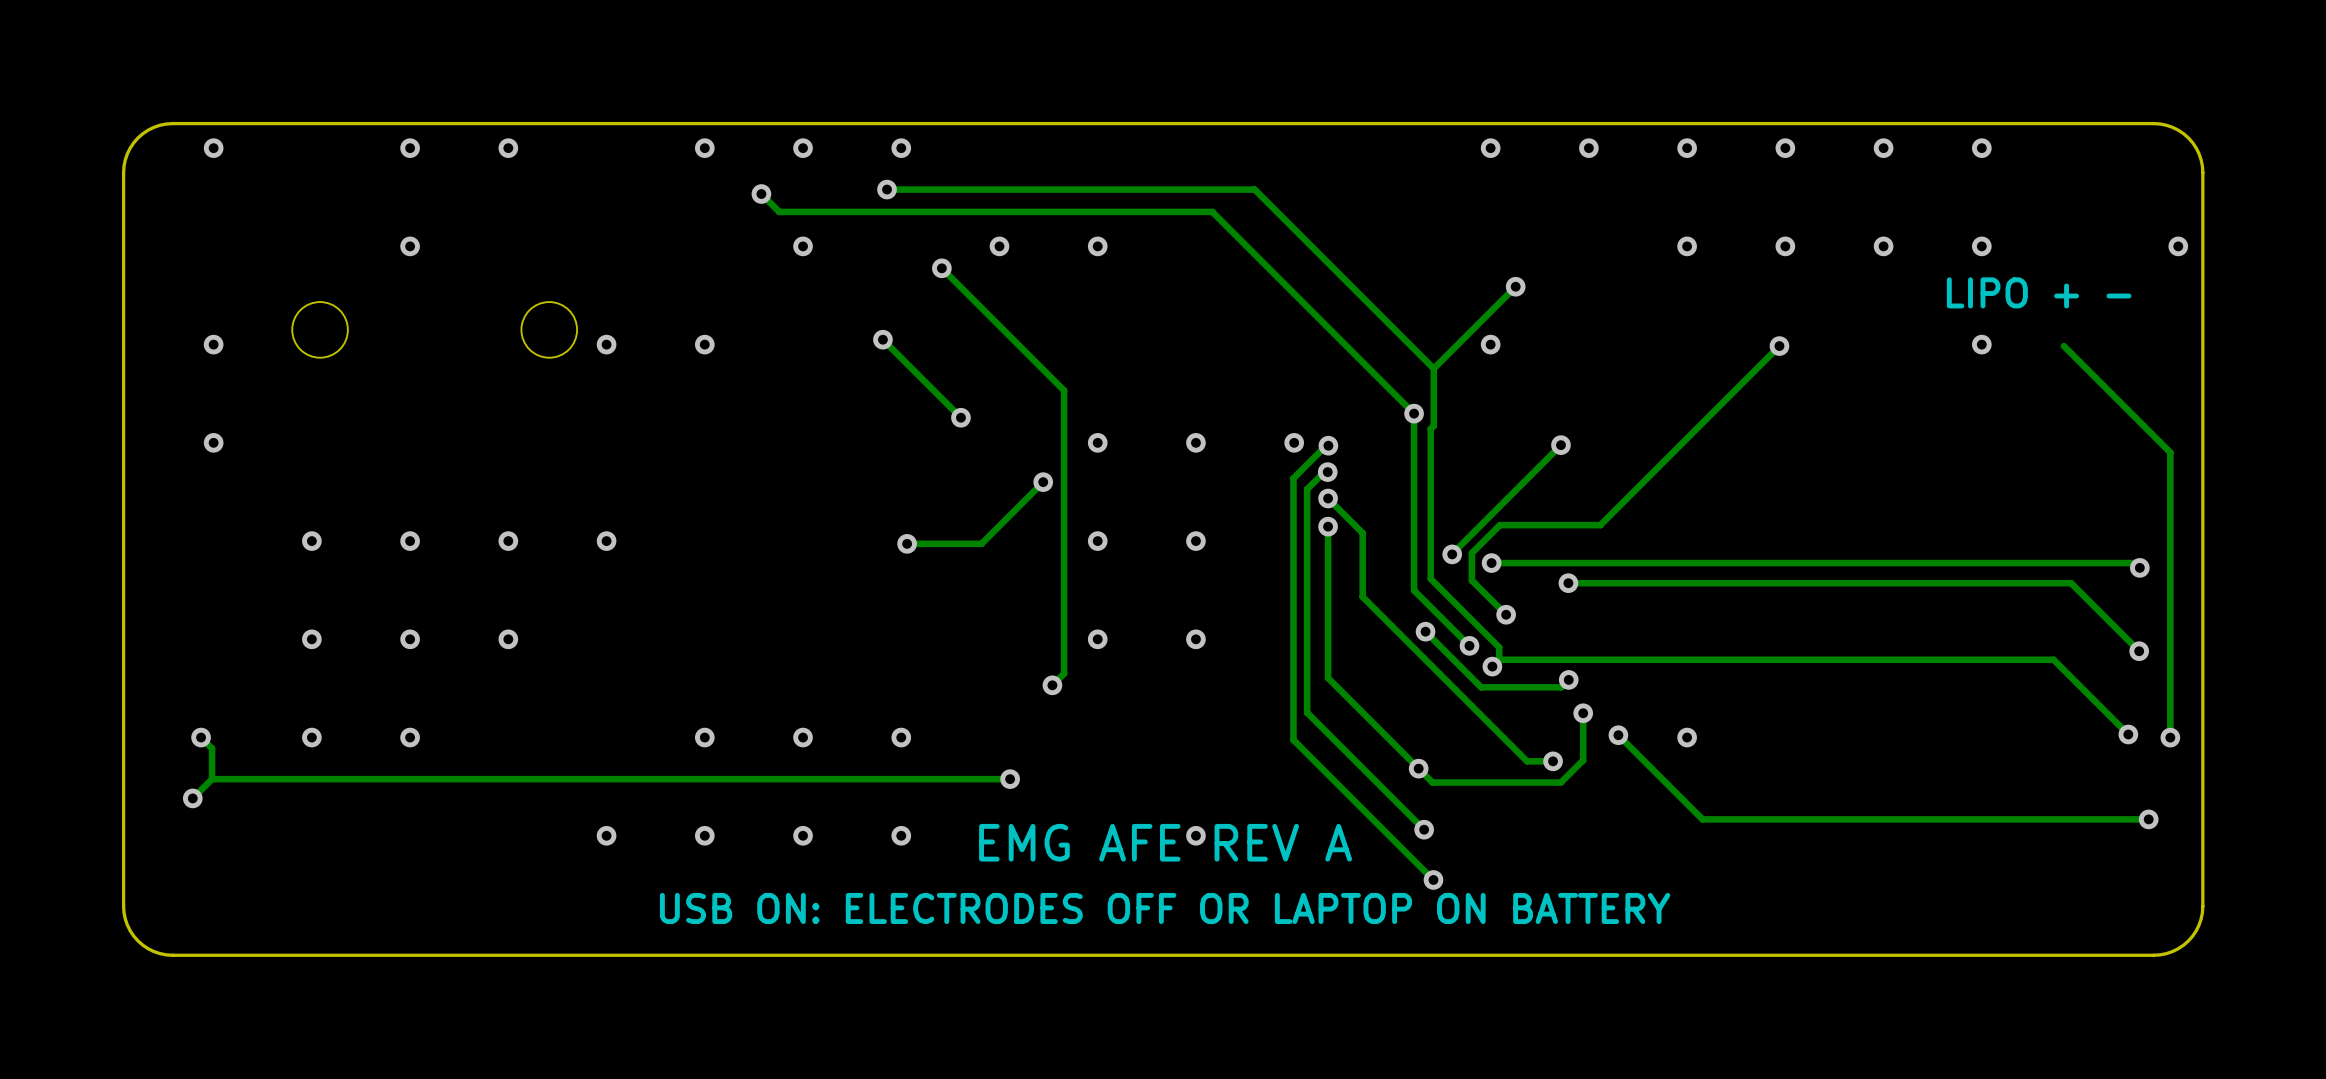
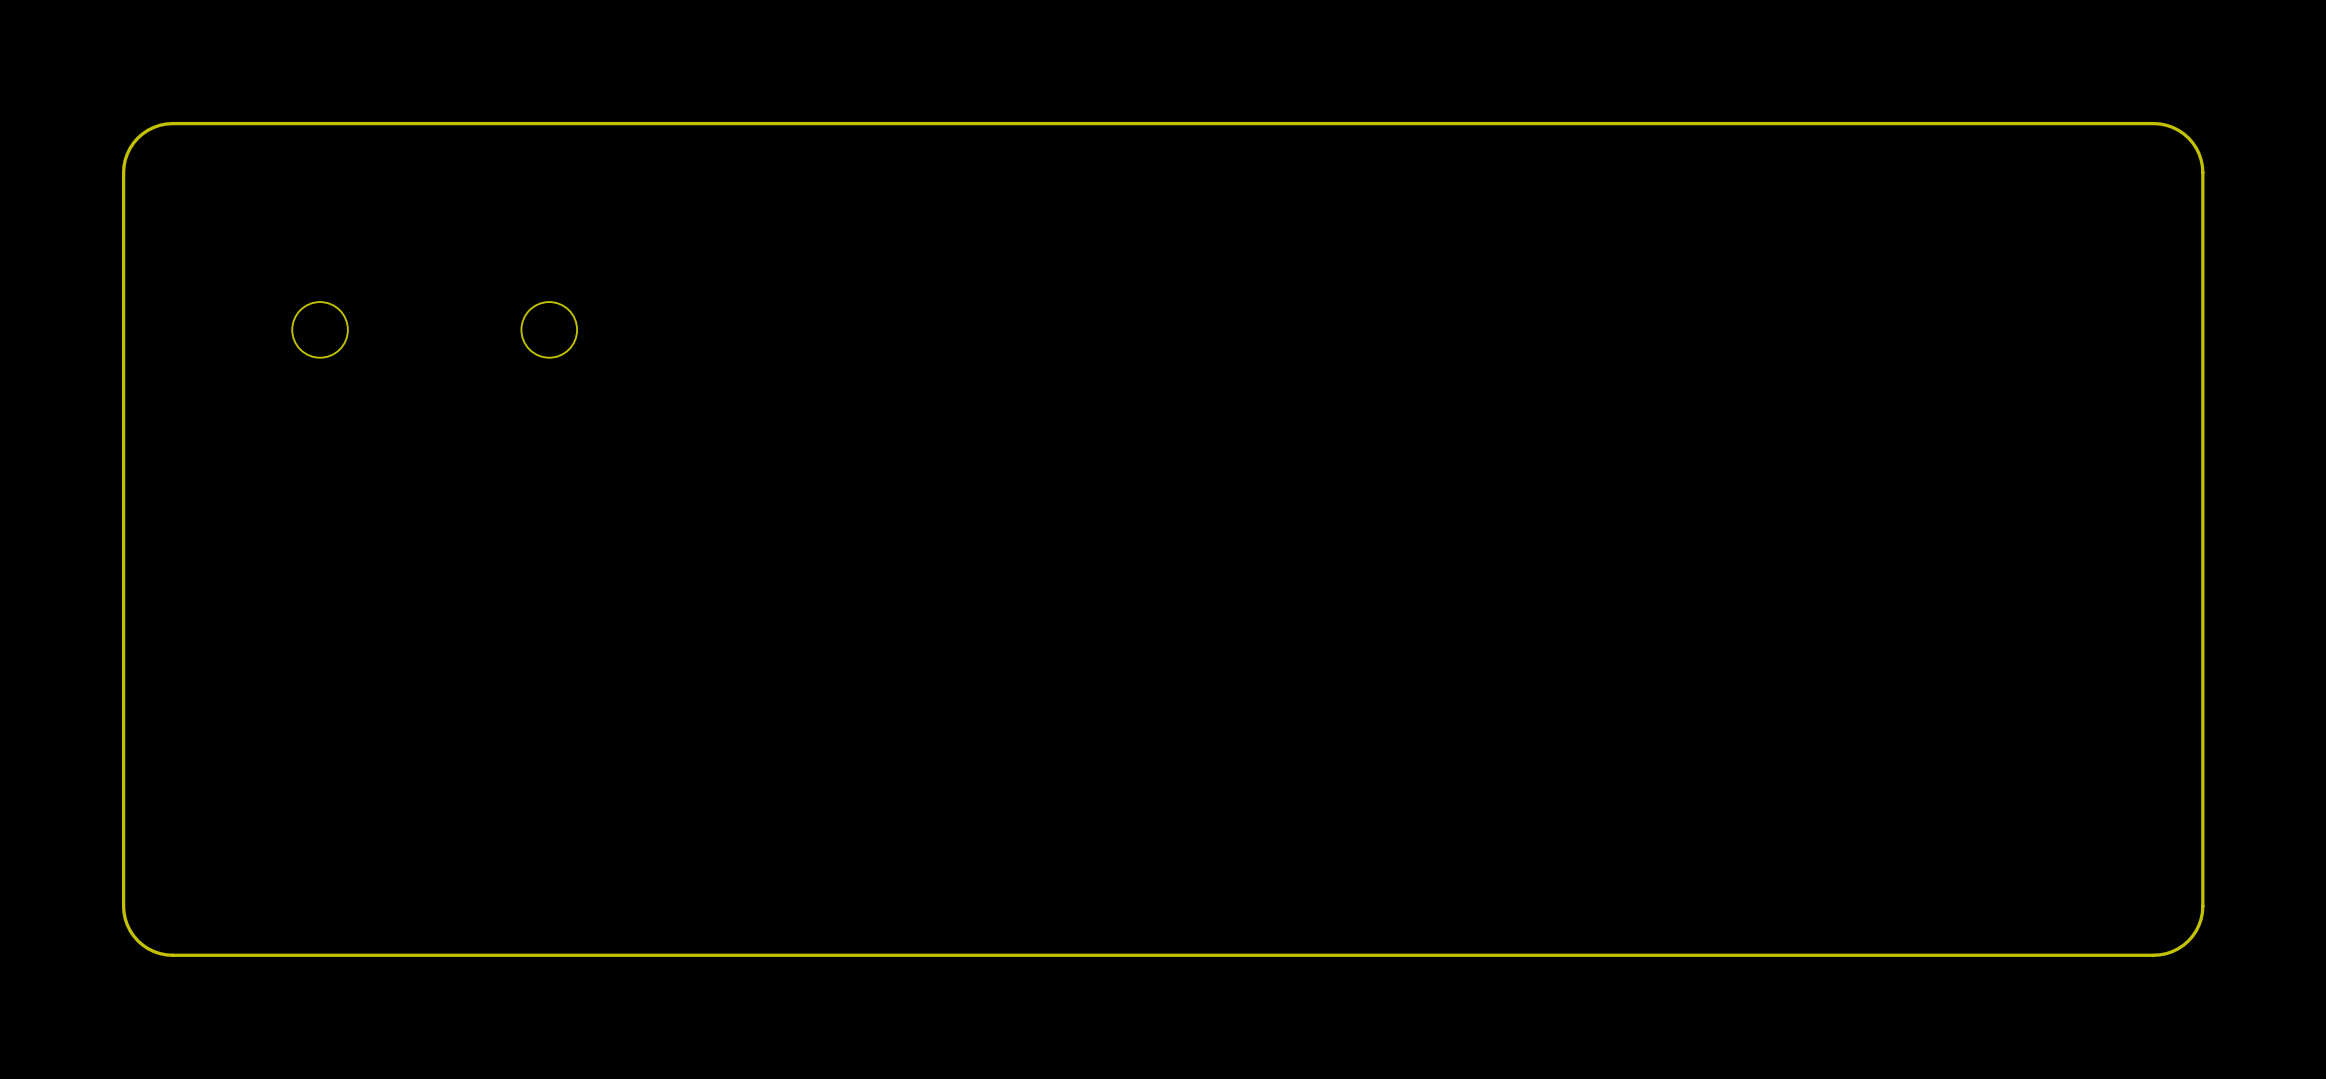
via: (213, 148) -> none
via: (410, 148) -> none
via: (508, 148) -> none
via: (704, 148) -> none
via: (803, 148) -> none
via: (901, 148) -> none
via: (1490, 148) -> none
via: (1588, 148) -> none
via: (1687, 148) -> none
via: (1785, 148) -> none
via: (1883, 148) -> none
via: (1981, 148) -> none
track: (887, 189) (1254, 189) (1433, 368) -> none
via: (887, 189) -> none
track: (761, 194) (779, 211) (1212, 211) (1414, 413) (1414, 590) (1469, 645) -> none
via: (761, 194) -> none
via: (410, 246) -> none
via: (803, 246) -> none
via: (999, 246) -> none
via: (1097, 246) -> none
via: (1687, 246) -> none
via: (1785, 246) -> none
via: (1883, 246) -> none
via: (1981, 246) -> none
via: (2178, 246) -> none
track: (941, 268) (1064, 390) (1064, 673) (1052, 685) -> none
via: (941, 268) -> none
track: (1515, 286) (1433, 368) -> none
via: (1515, 286) -> none
text: LIPO + - (2039, 292) -> none
track: (882, 339) (960, 417) -> none
via: (882, 339) -> none
via: (213, 344) -> none
via: (606, 344) -> none
via: (704, 344) -> none
via: (1490, 344) -> none
via: (1981, 344) -> none
track: (1779, 346) (1600, 525) (1499, 525) (1471, 553) (1471, 580) (1506, 614) -> none
via: (1779, 346) -> none
track: (2063, 346) (2170, 452) (2170, 737) -> none
track: (1433, 368) (1433, 425) (1430, 428) (1430, 578) (1499, 647) (1499, 659) -> none
via: (1414, 413) -> none
via: (960, 417) -> none
via: (213, 442) -> none
via: (1097, 442) -> none
via: (1195, 442) -> none
via: (1294, 442) -> none
track: (1328, 445) (1326, 445) (1293, 478) (1293, 739) (1433, 879) -> none
via: (1328, 445) -> none
track: (1560, 445) (1452, 553) -> none
via: (1560, 445) -> none
track: (1327, 472) (1324, 472) (1307, 489) (1307, 712) (1424, 829) -> none
via: (1327, 472) -> none
track: (1043, 482) (981, 543) (907, 543) -> none
via: (1043, 482) -> none
track: (1328, 498) (1362, 533) (1362, 596) (1527, 761) (1553, 761) -> none
via: (1328, 498) -> none
track: (1328, 526) (1328, 678) (1432, 782) (1560, 782) (1583, 760) (1583, 713) -> none
via: (1328, 526) -> none
via: (311, 541) -> none
via: (410, 541) -> none
via: (508, 541) -> none
via: (606, 541) -> none
via: (1097, 541) -> none
via: (1195, 541) -> none
via: (907, 543) -> none
via: (1452, 554) -> none
track: (1491, 563) (2135, 563) (2139, 567) -> none
via: (1491, 563) -> none
via: (2139, 567) -> none
track: (1568, 583) (2071, 583) (2139, 651) -> none
via: (1568, 583) -> none
via: (1506, 614) -> none
track: (1425, 631) (1481, 687) (1561, 687) (1568, 679) -> none
via: (1425, 631) -> none
via: (311, 639) -> none
via: (410, 639) -> none
via: (508, 639) -> none
via: (1097, 639) -> none
via: (1195, 639) -> none
via: (1469, 645) -> none
via: (2139, 651) -> none
track: (1499, 659) (2053, 659) (2128, 734) -> none
via: (1492, 666) -> none
via: (1568, 679) -> none
via: (1052, 685) -> none
via: (1583, 713) -> none
via: (2128, 734) -> none
track: (1618, 735) (1702, 819) (2148, 819) -> none
via: (1618, 735) -> none
track: (201, 737) (212, 748) (212, 779) -> none
via: (201, 737) -> none
via: (311, 737) -> none
via: (410, 737) -> none
via: (704, 737) -> none
via: (803, 737) -> none
via: (901, 737) -> none
via: (1687, 737) -> none
via: (2170, 737) -> none
via: (1553, 761) -> none
via: (1418, 768) -> none
track: (212, 779) (192, 798) -> none
track: (1010, 779) (212, 779) -> none
via: (1010, 779) -> none
via: (192, 798) -> none
via: (2148, 819) -> none
via: (1424, 829) -> none
via: (606, 835) -> none
via: (704, 835) -> none
via: (803, 835) -> none
via: (901, 835) -> none
via: (1195, 835) -> none
text: EMG AFE REV A (1165, 842) -> none
via: (1433, 879) -> none
text: USB ON: ELECTRODES OFF OR LAPTOP ON BATTERY (1165, 908) -> none

